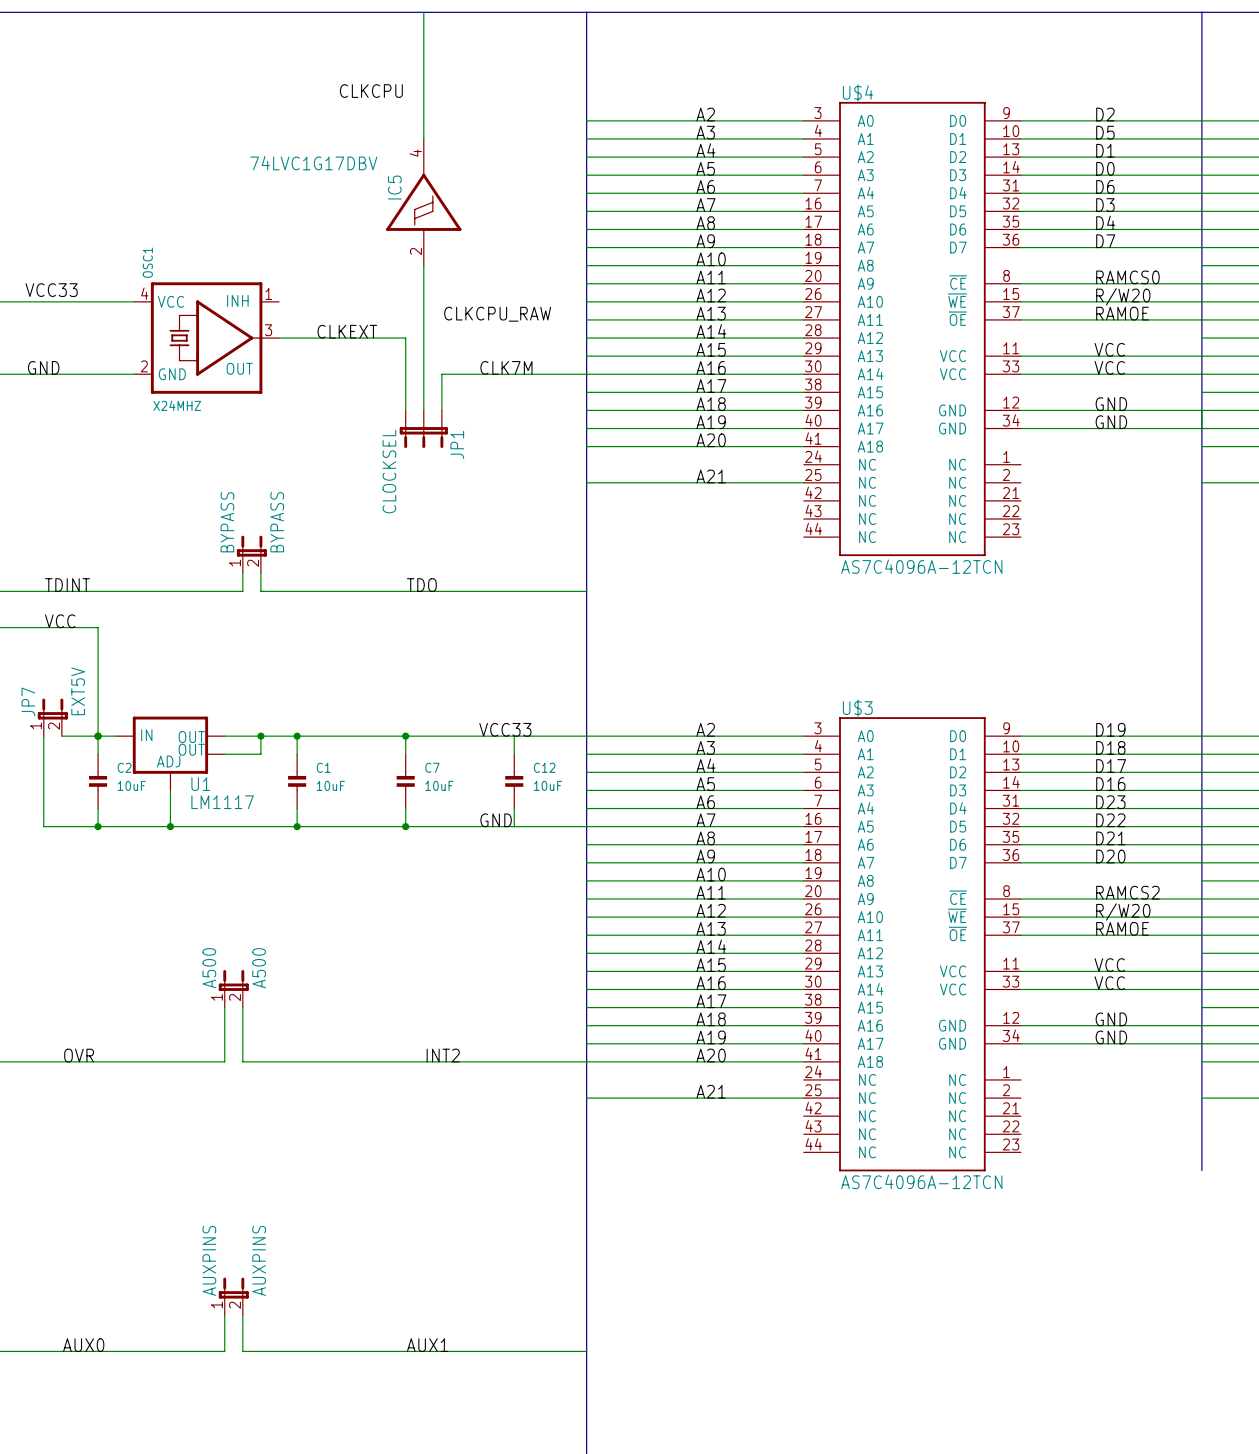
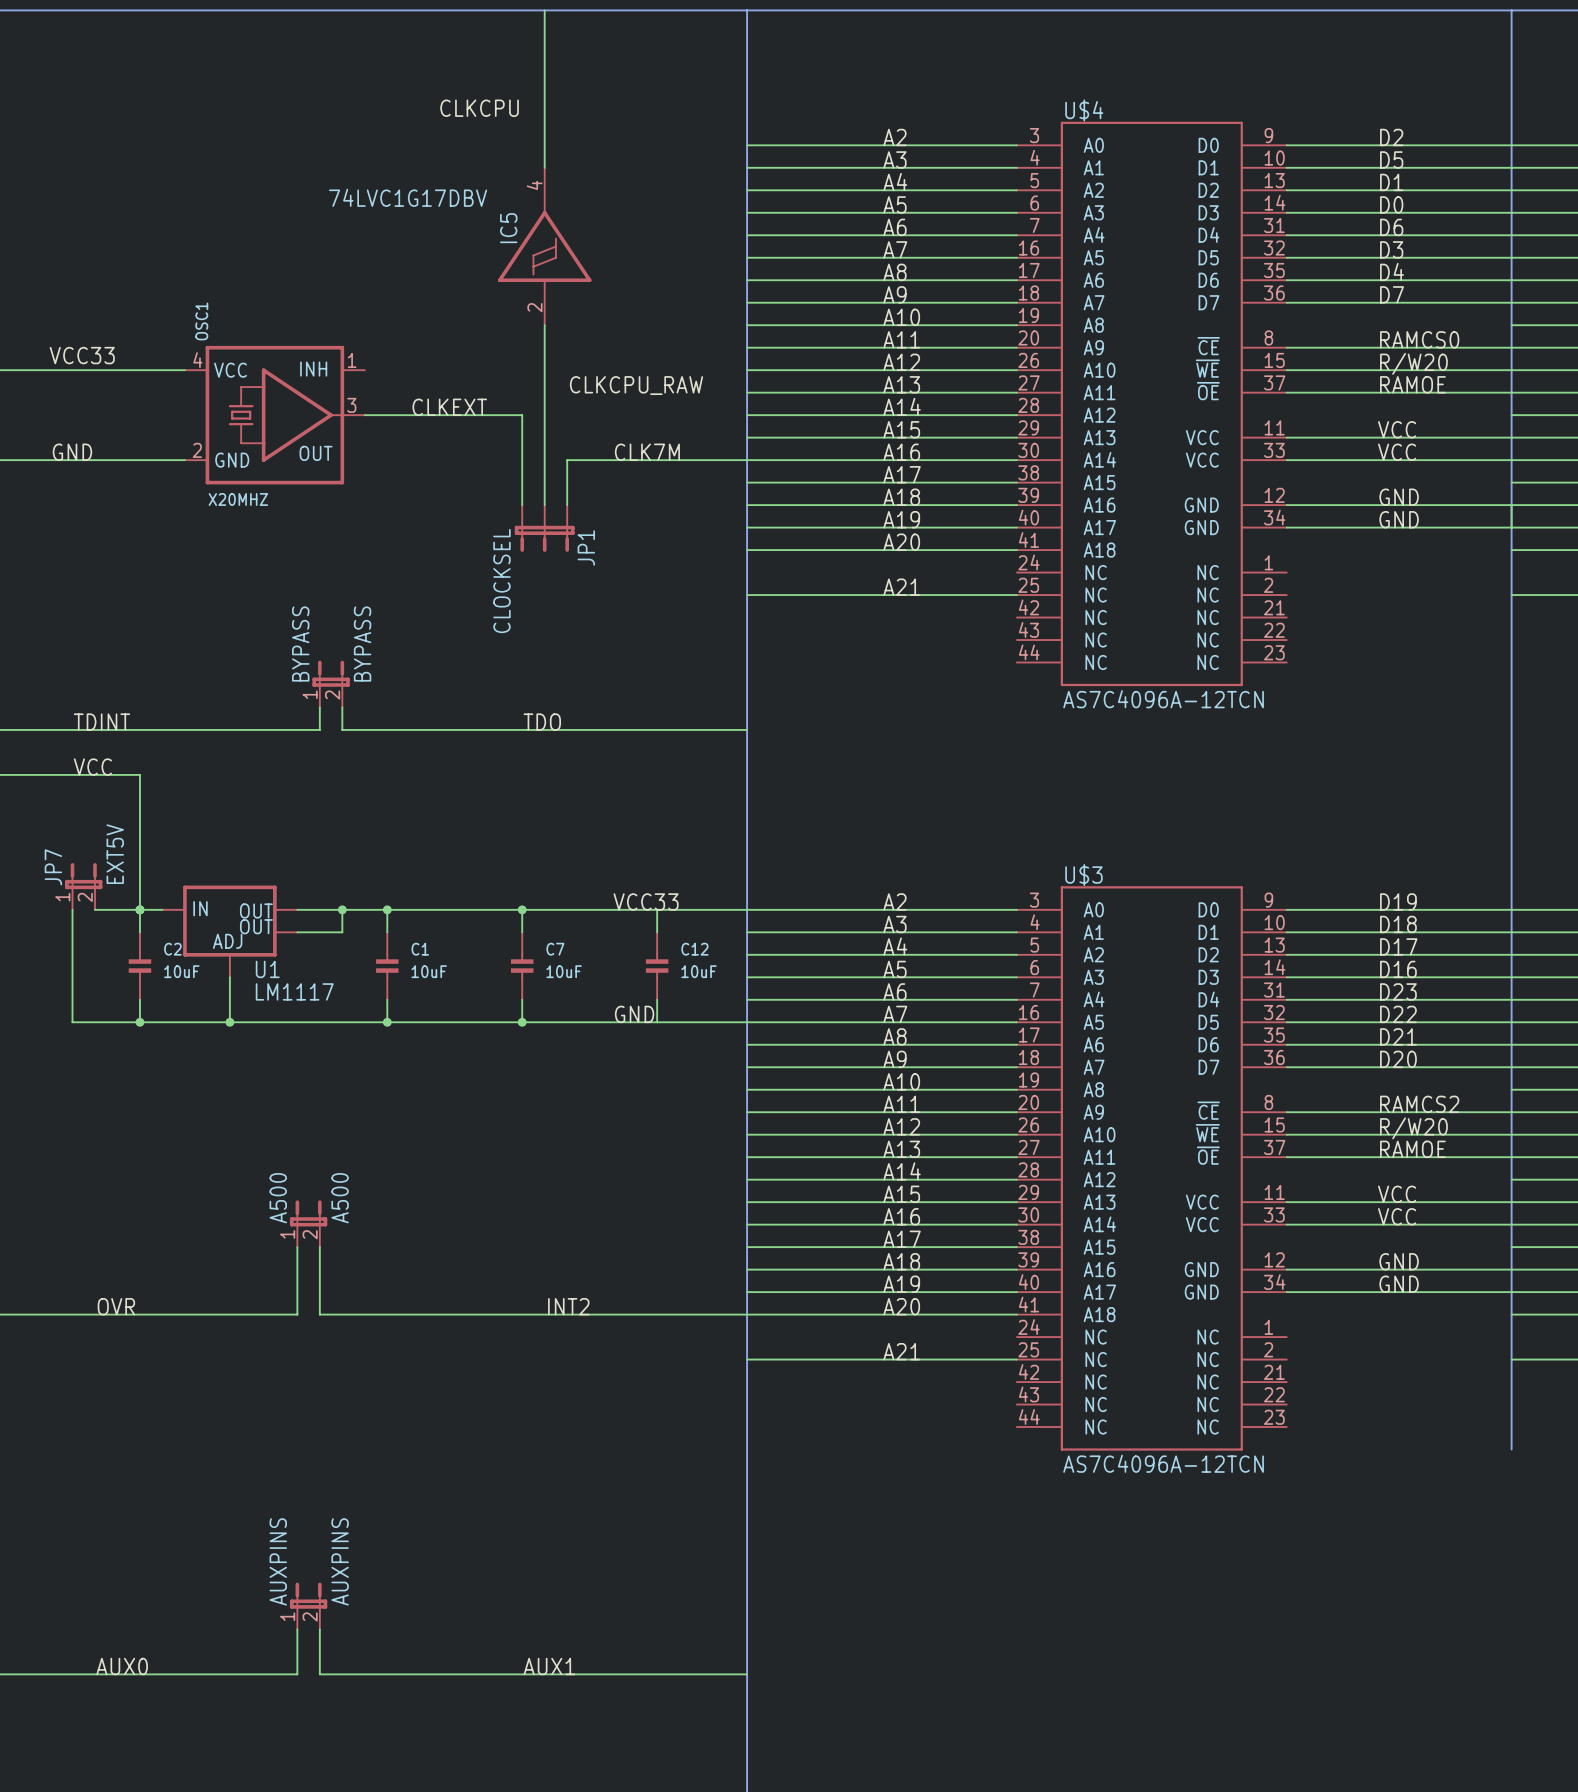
OSC1 value: X24MHZ (177, 405) -> X20MHZ (238, 499)

